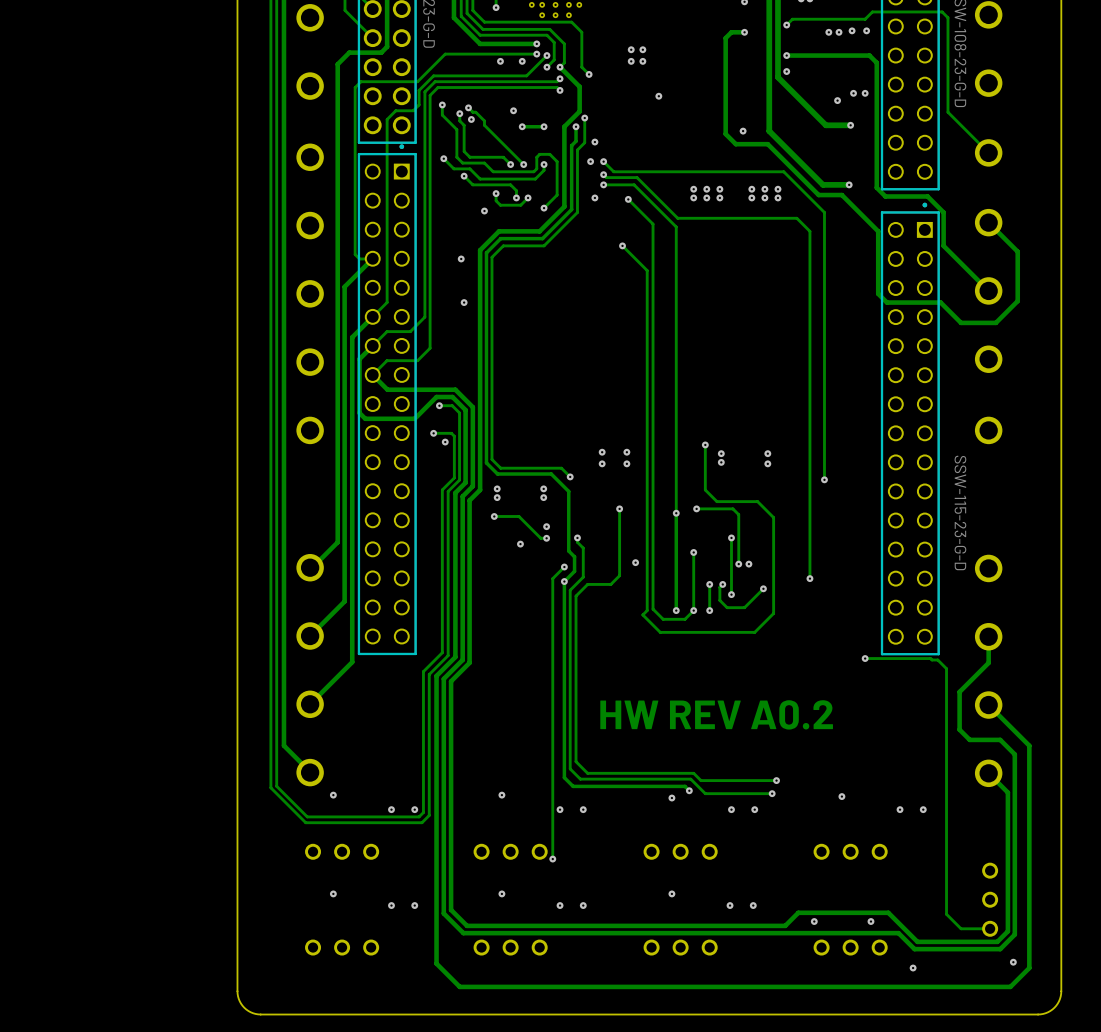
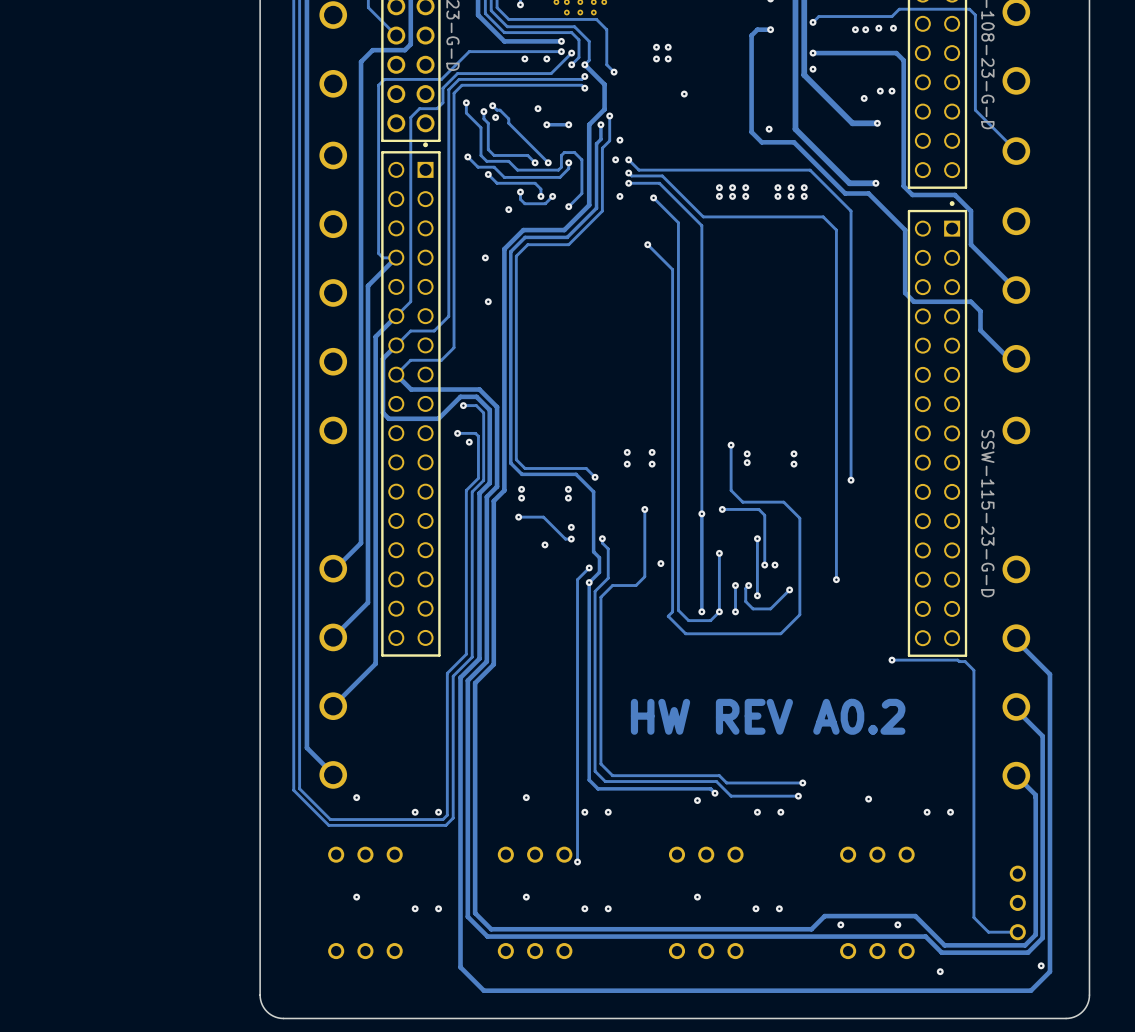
track: (988, 222) (1017, 251) (1017, 301) (995, 322) (961, 322) (940, 302) -> (1011, 359) (980, 330) (980, 311) (970, 301) (968, 301)
track: (988, 636) (988, 662) (959, 691) (959, 729) (969, 739) (1000, 739) (1014, 754) -> (1011, 705) (1042, 736) (1042, 756)
track: (988, 705) (1029, 745) (1029, 968) (1010, 986) (1003, 986) -> (1011, 636) (1049, 674) (1049, 971) (1030, 990)

